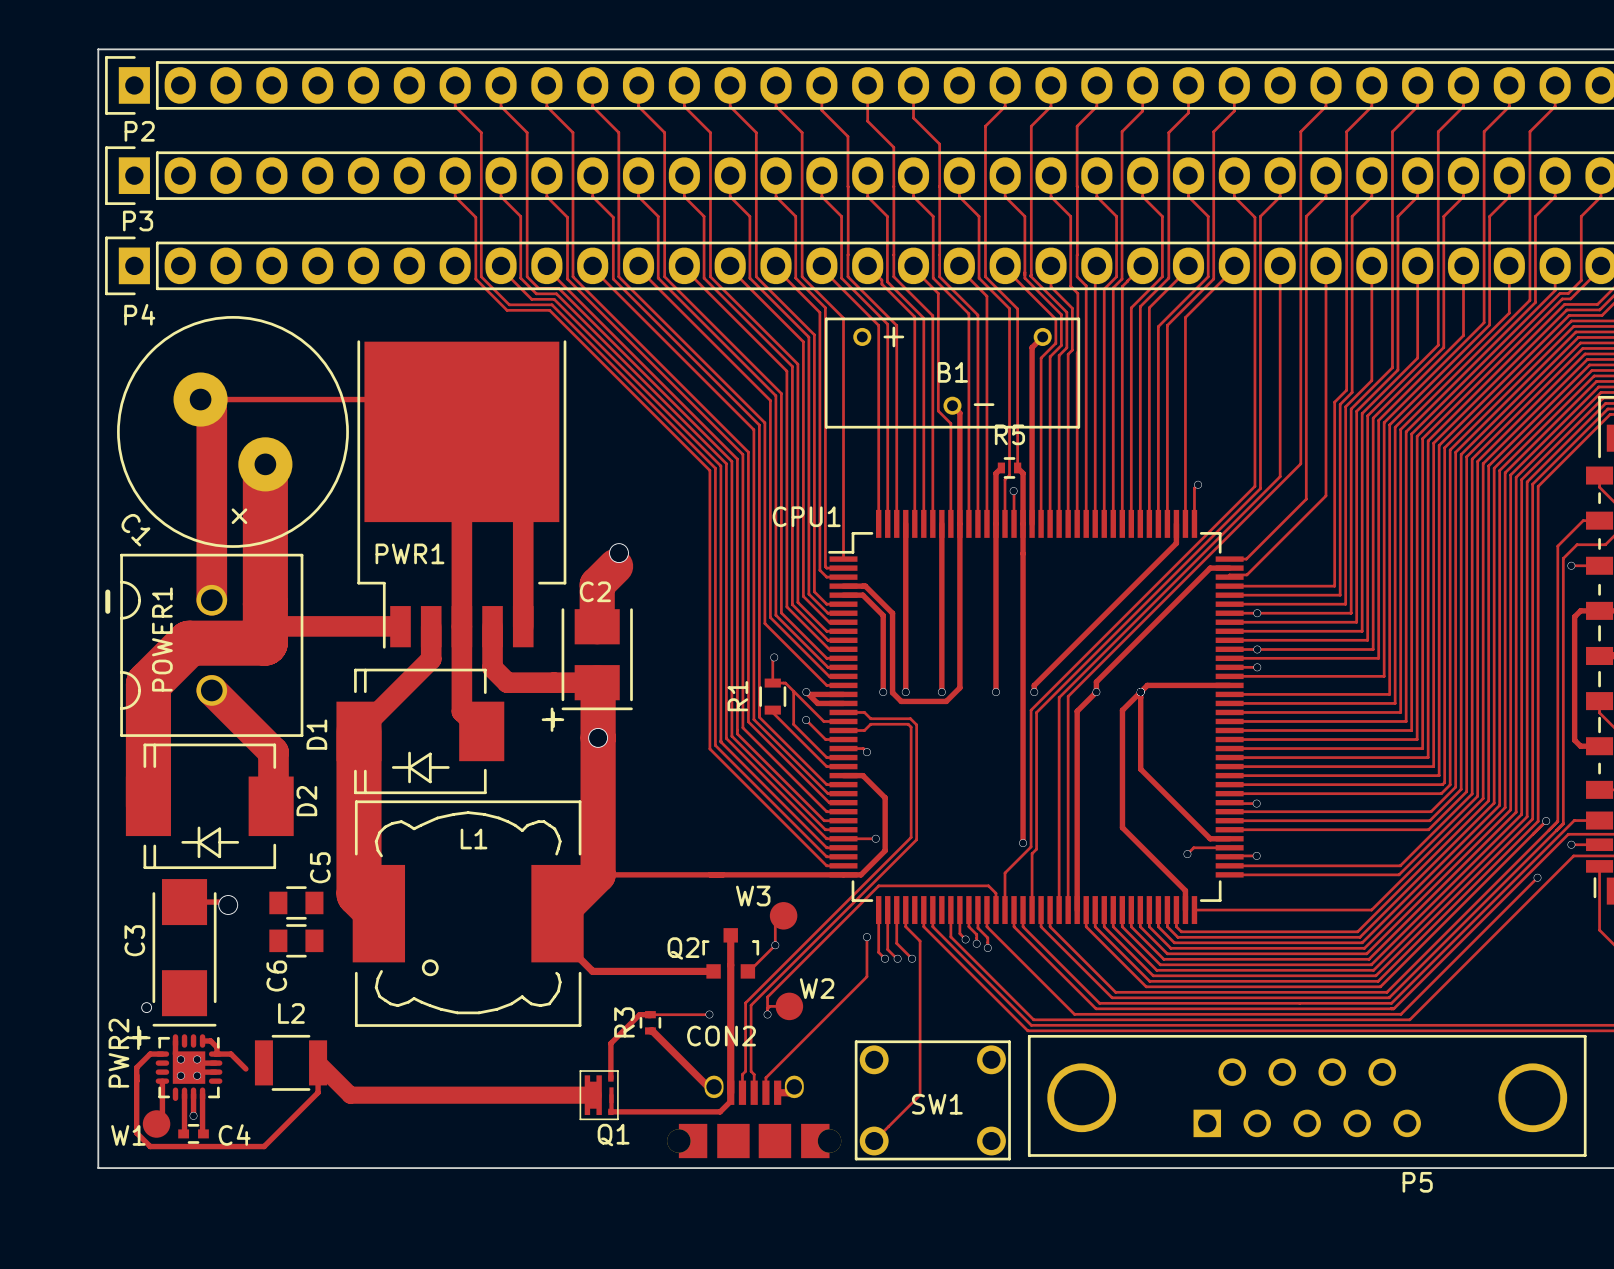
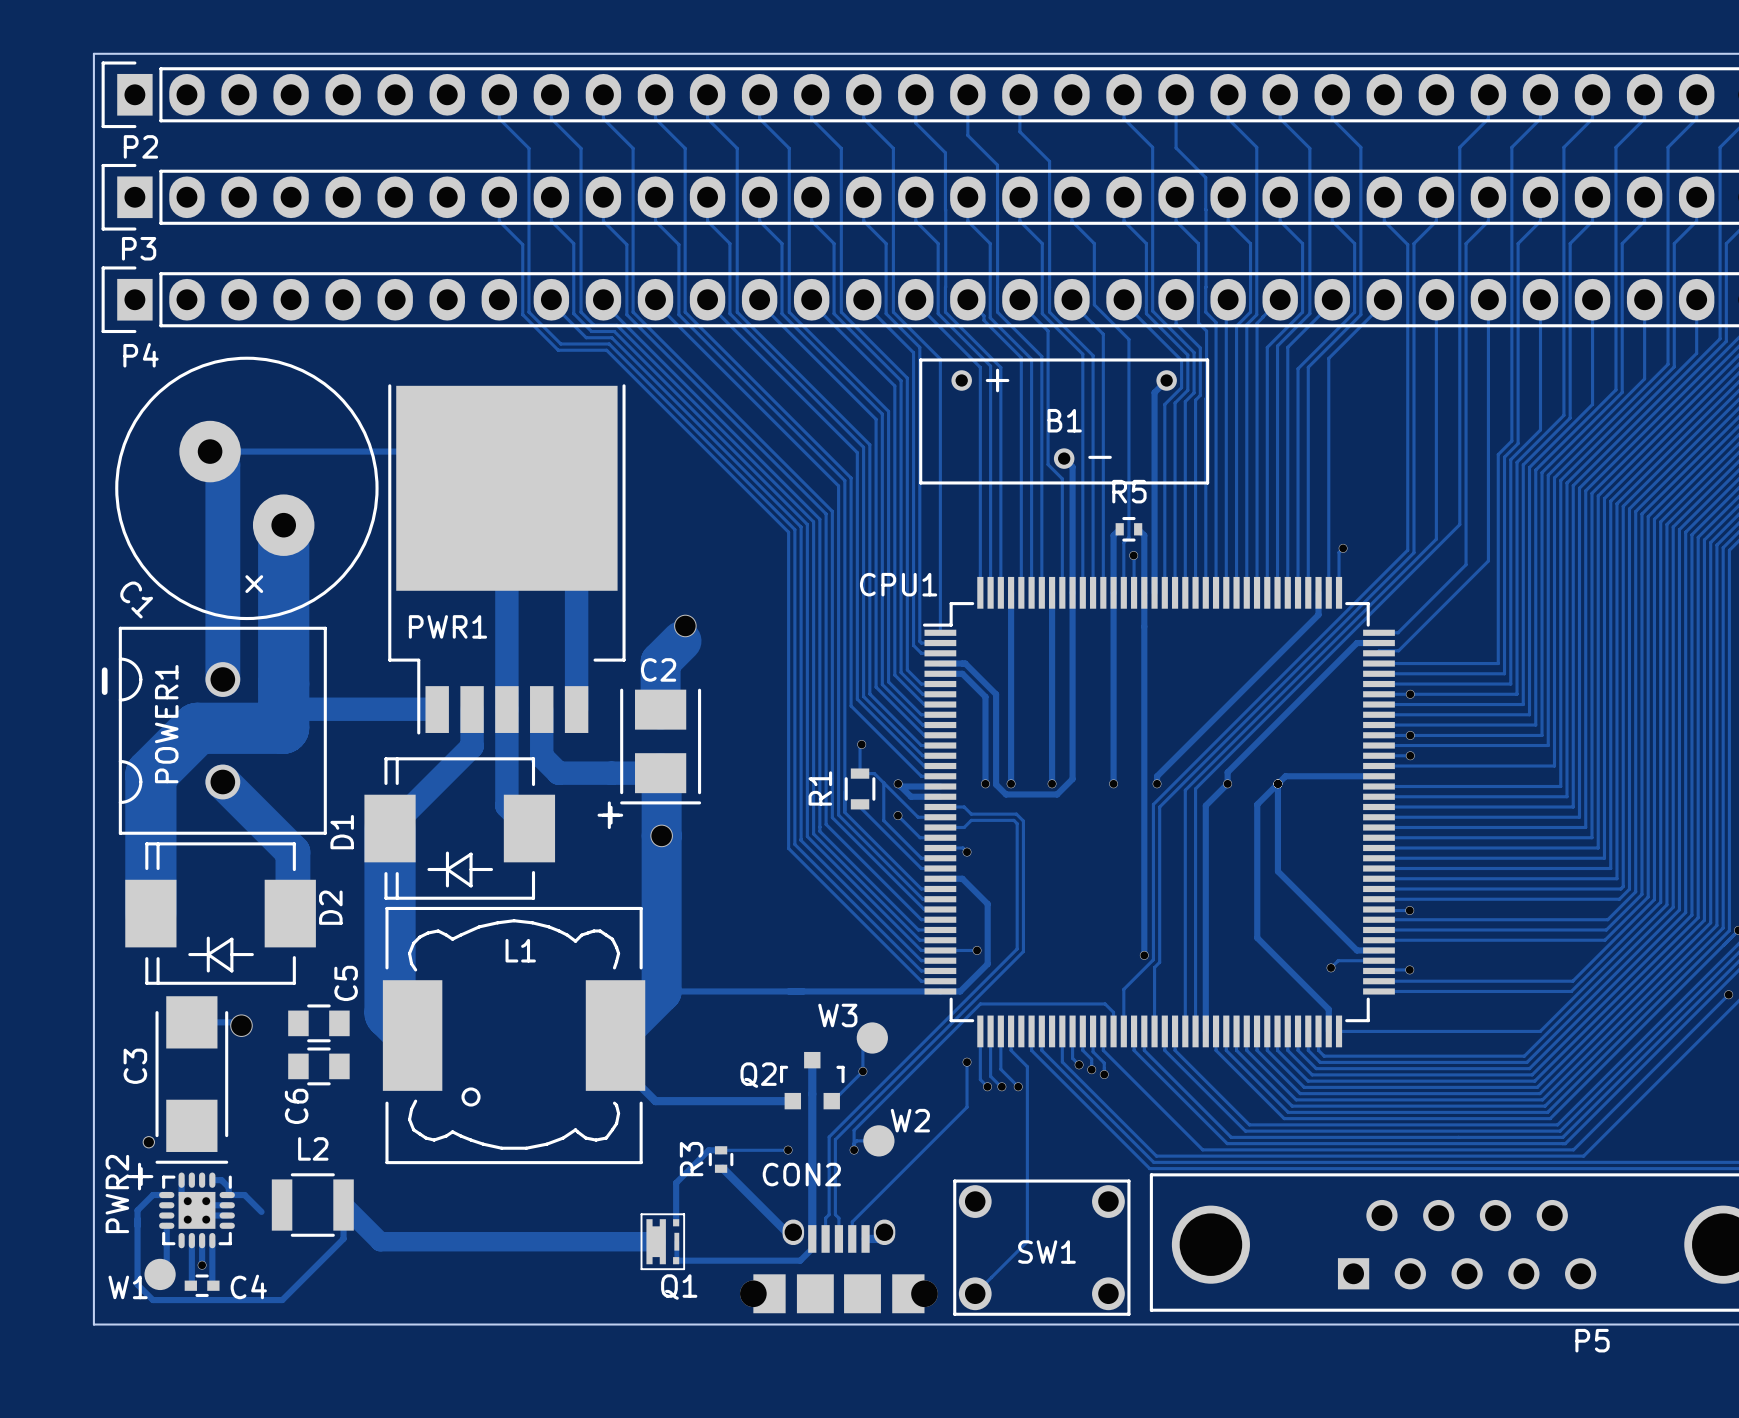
track: (1234, 85) (1234, 111) (1213, 131) -> none
track: (1005, 106) (985, 126) (985, 276) -> (1124, 118) (1152, 147) (1152, 311)
track: (1051, 106) (1031, 126) (1030, 275) -> none
track: (1096, 106) (1077, 126) (1077, 158) -> (1176, 118) (1176, 147) (1205, 177)
track: (1142, 106) (1142, 111) (1122, 131) -> (1228, 118) (1256, 147)
track: none -> (1280, 118) (1309, 148)
track: (1188, 106) (1188, 112) (1168, 132) -> (1332, 118) (1360, 147)
track: (979, 270) (979, 278) (1009, 308) -> (1094, 304) (1101, 312)
track: (1009, 300) (1017, 308) (1017, 467) -> (1128, 339) (1128, 348)

